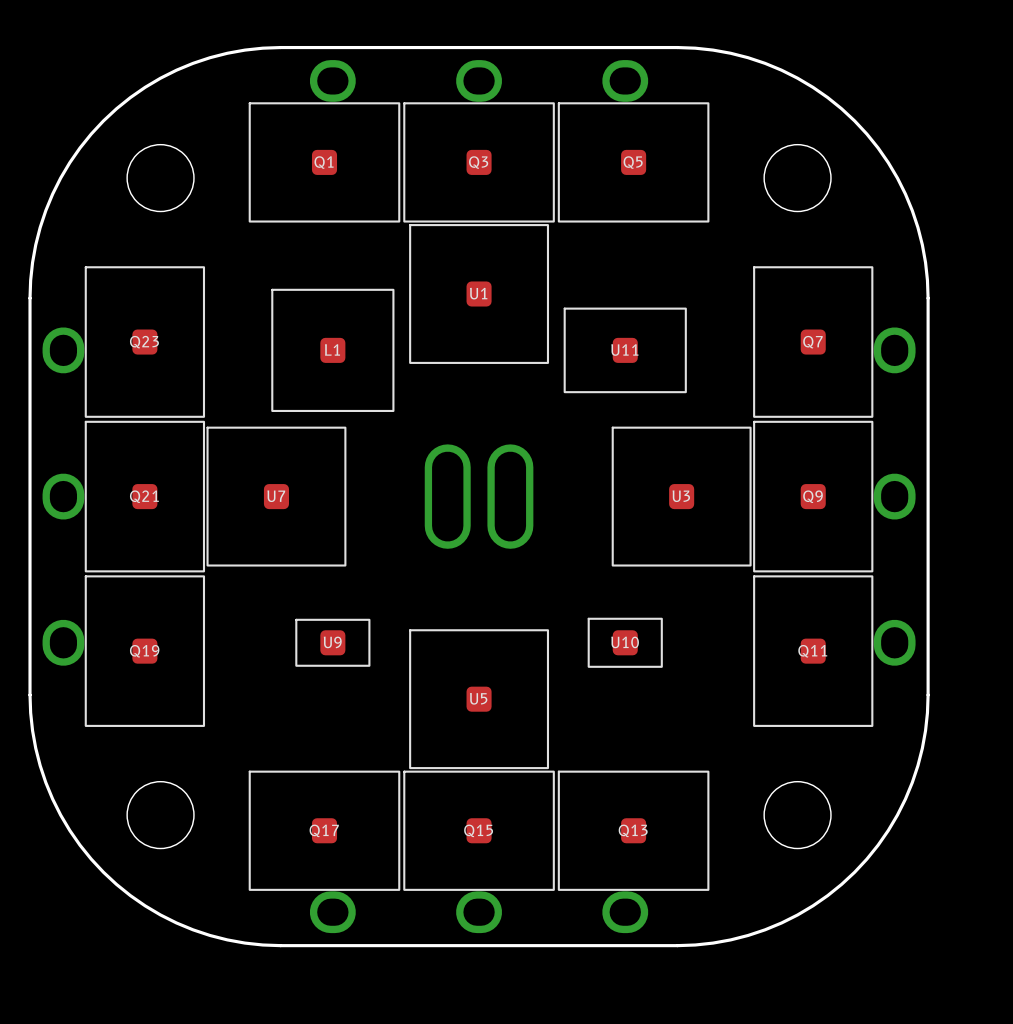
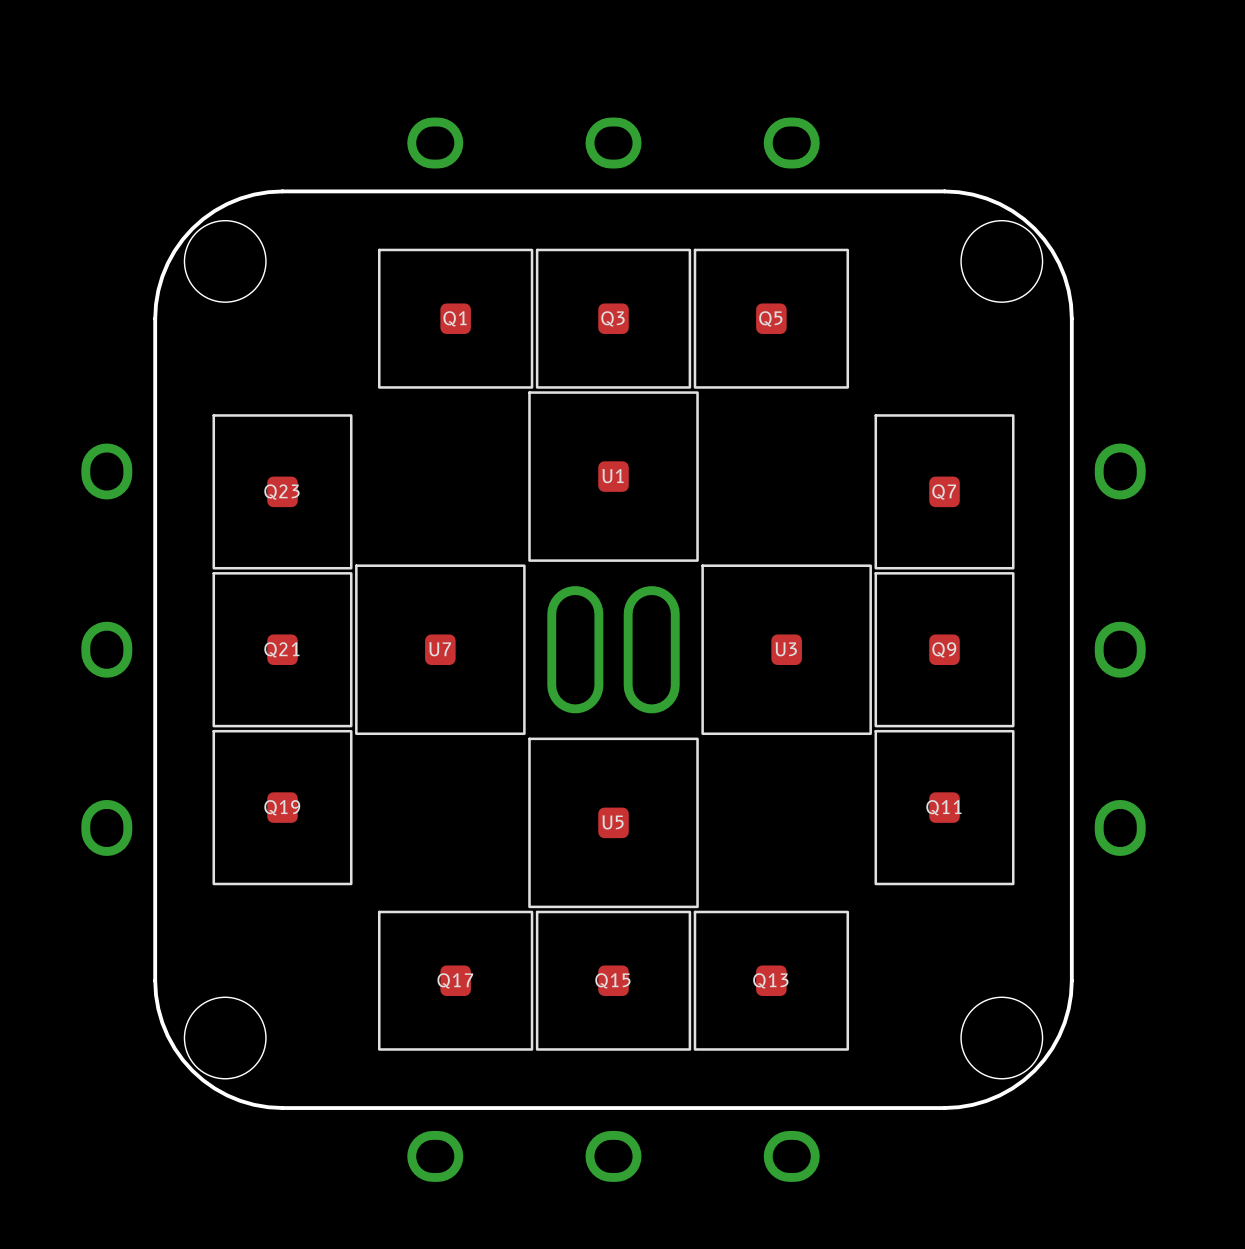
board edge: (280, 47) (677, 47) (730, 53) (781, 70) (812, 87) (854, 120) (888, 162) (905, 194) (917, 227) (927, 280) (927, 712) (917, 765) (897, 815) (878, 845) (854, 872) (812, 905) (781, 922) (748, 935) (695, 944) (262, 944) (210, 935) (160, 914) (130, 895) (103, 872) (69, 830) (52, 799) (40, 765) (30, 712) (30, 298) (32, 262) (40, 227) (52, 194) (69, 162) (103, 120) (130, 97) (176, 70) (210, 57) (244, 50) (280, 47) -> (282, 191) (254, 194) (240, 198) (214, 210) (203, 219) (182, 239) (174, 250) (162, 276) (155, 304) (155, 980) (158, 1009) (162, 1022) (174, 1048) (182, 1060) (203, 1080) (227, 1095) (254, 1104) (282, 1108) (944, 1108) (972, 1104) (986, 1100) (1012, 1088) (1023, 1080) (1044, 1060) (1059, 1035) (1068, 1009) (1071, 980) (1071, 318) (1068, 290) (1064, 276) (1052, 250) (1044, 239) (1034, 228) (1012, 210) (986, 198) (958, 192) (282, 191)
Q1 footprint: [248, 102, 401, 223] -> [377, 248, 534, 389]
Q3 footprint: [403, 102, 555, 223] -> [535, 248, 692, 389]
Q5 footprint: [557, 102, 710, 223] -> [693, 248, 850, 389]
Q23 footprint: [84, 266, 206, 418] -> [212, 414, 353, 570]
Q7 footprint: [753, 266, 874, 418] -> [874, 414, 1015, 570]
U1 position: (479, 293) -> (613, 476)
L1: (332, 350) -> none
U11: (625, 350) -> none
Q21 footprint: [84, 420, 206, 573] -> [212, 572, 353, 728]
Q9 footprint: [753, 420, 874, 573] -> [874, 572, 1015, 728]
U7 position: (276, 496) -> (440, 649)
U3 position: (681, 496) -> (786, 649)
Q19 footprint: [84, 575, 206, 727] -> [212, 729, 353, 886]
Q11 footprint: [753, 575, 874, 727] -> [874, 729, 1015, 886]
U9: (332, 642) -> none
U10: (625, 642) -> none
U5 position: (479, 699) -> (613, 822)
Q17 footprint: [248, 770, 401, 891] -> [377, 910, 534, 1051]
Q15 footprint: [403, 770, 555, 891] -> [535, 910, 692, 1051]
Q13 footprint: [557, 770, 710, 891] -> [693, 910, 850, 1051]

